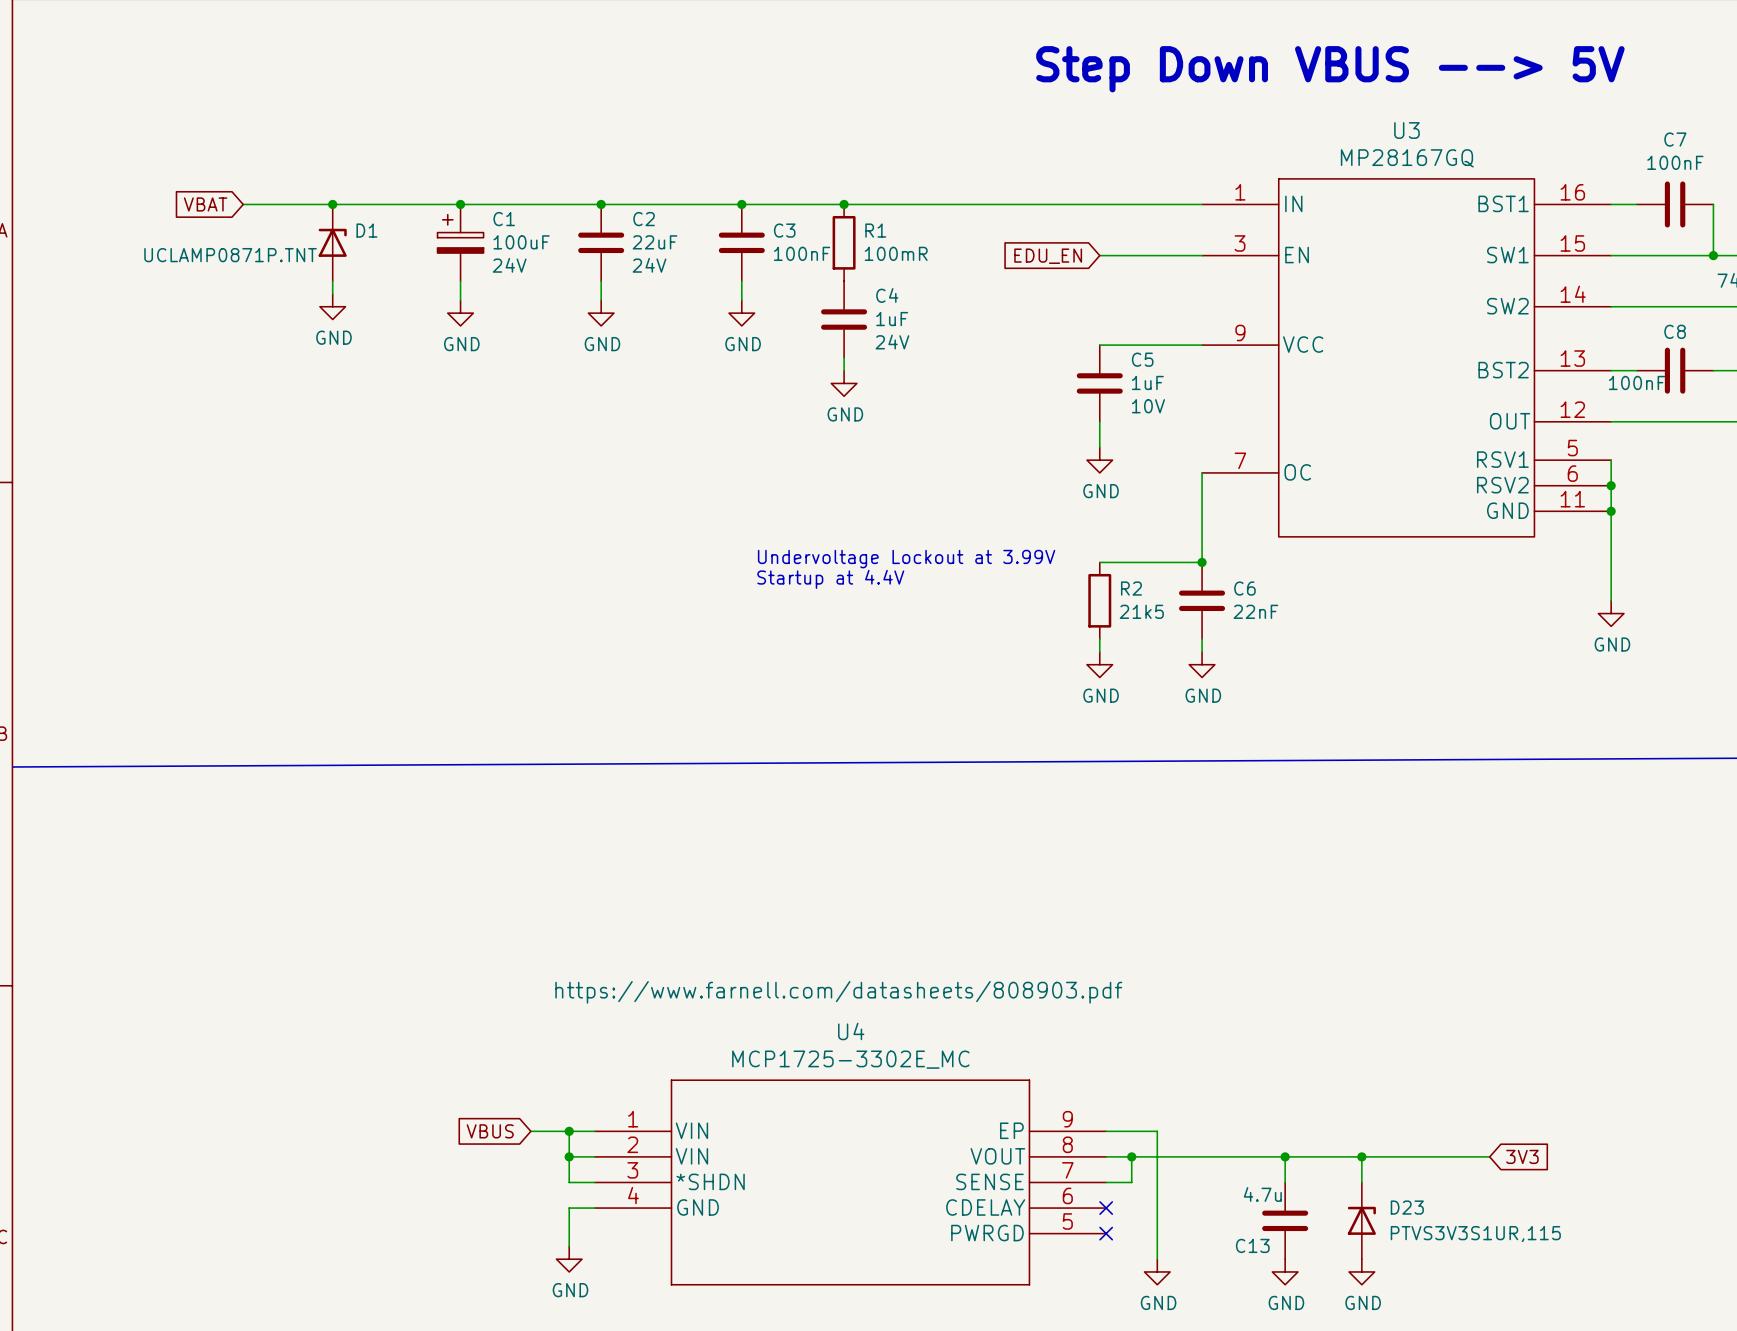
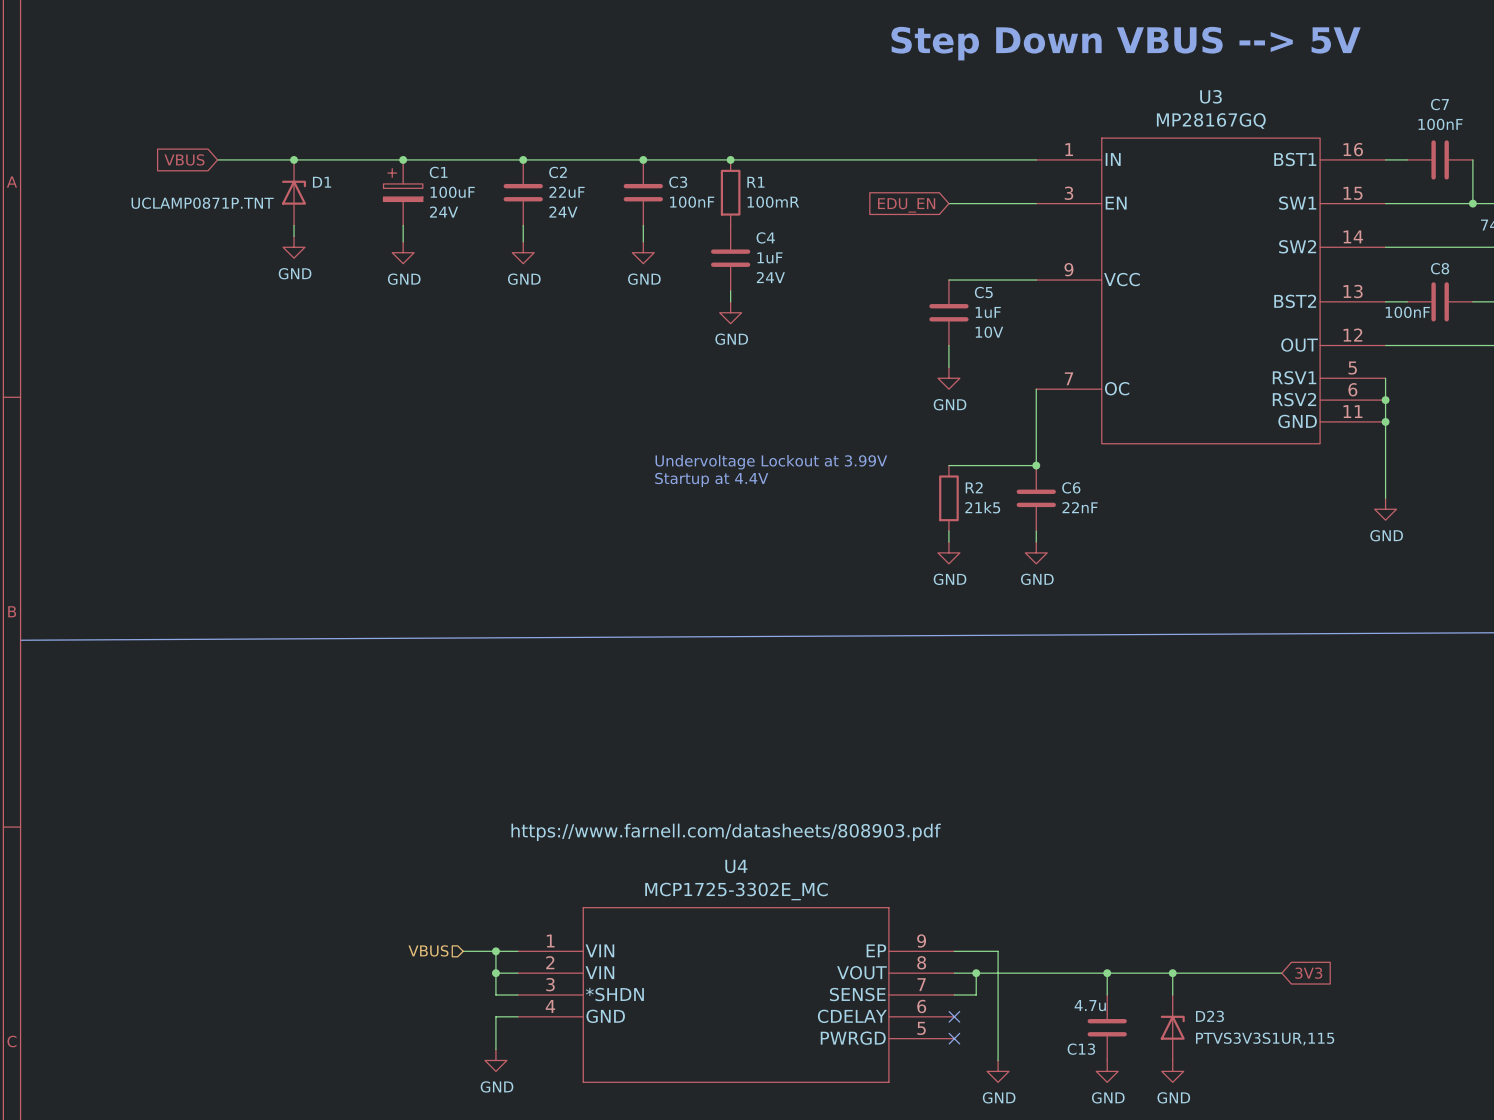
global label: VBAT (205, 204) -> VBUS (184, 159)
hierarchical label: none -> VBUS (428, 950)
global label: VBUS (490, 1131) -> none

